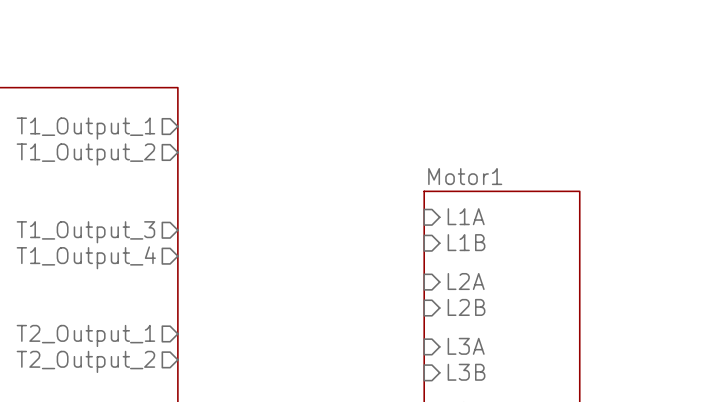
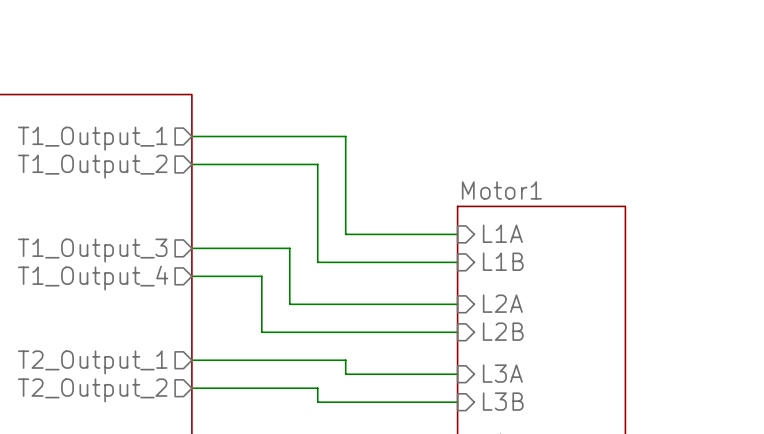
wire: none -> (191, 136) (345, 136) (345, 234) (457, 234)
wire: none -> (191, 164) (317, 164) (317, 262) (457, 262)
wire: none -> (191, 248) (289, 248) (289, 304) (457, 304)
wire: none -> (191, 276) (261, 276) (261, 332) (457, 332)
wire: none -> (191, 360) (345, 360) (345, 374) (457, 374)
wire: none -> (191, 388) (317, 388) (317, 402) (457, 402)

